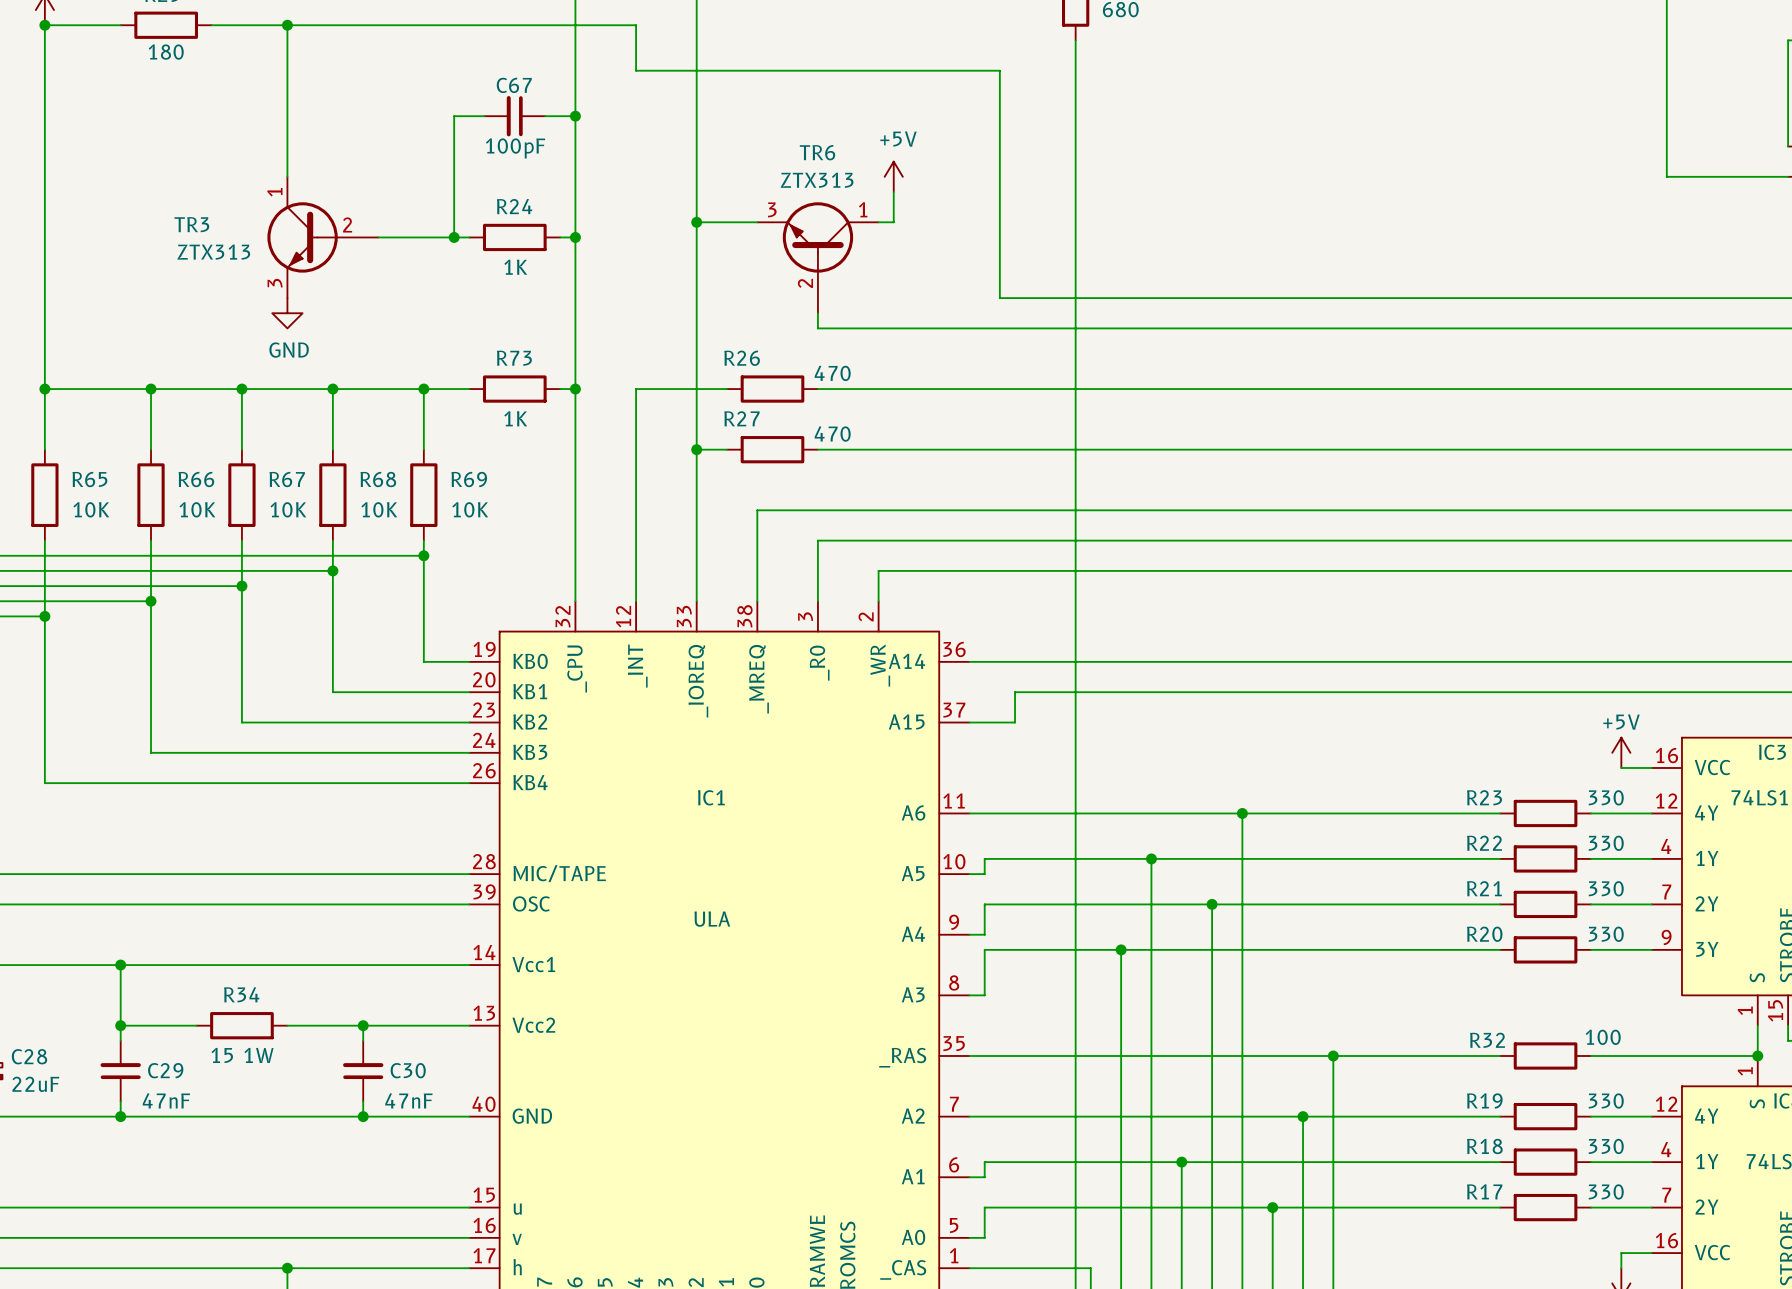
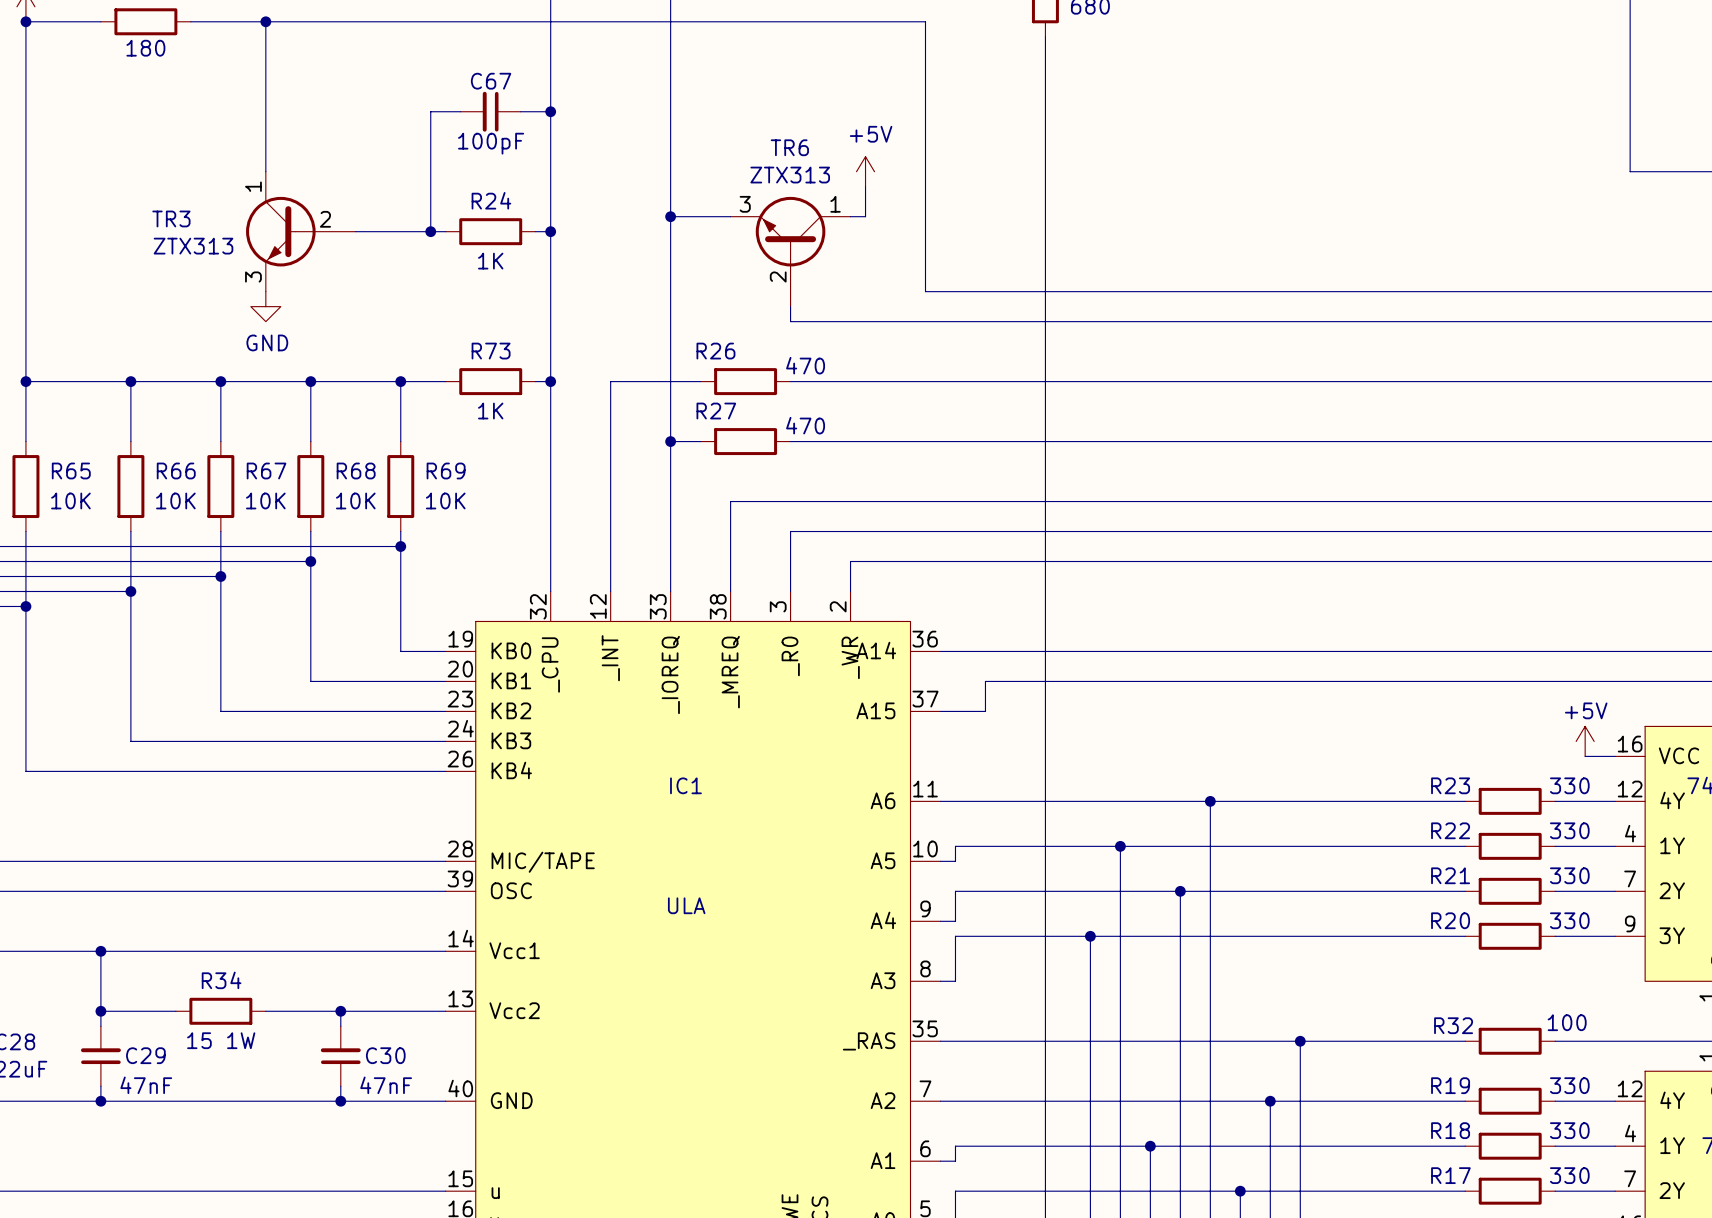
wire: (636, 25) (636, 70) (999, 70) (999, 298) -> (610, 21) (925, 21) (925, 291) (970, 291)

